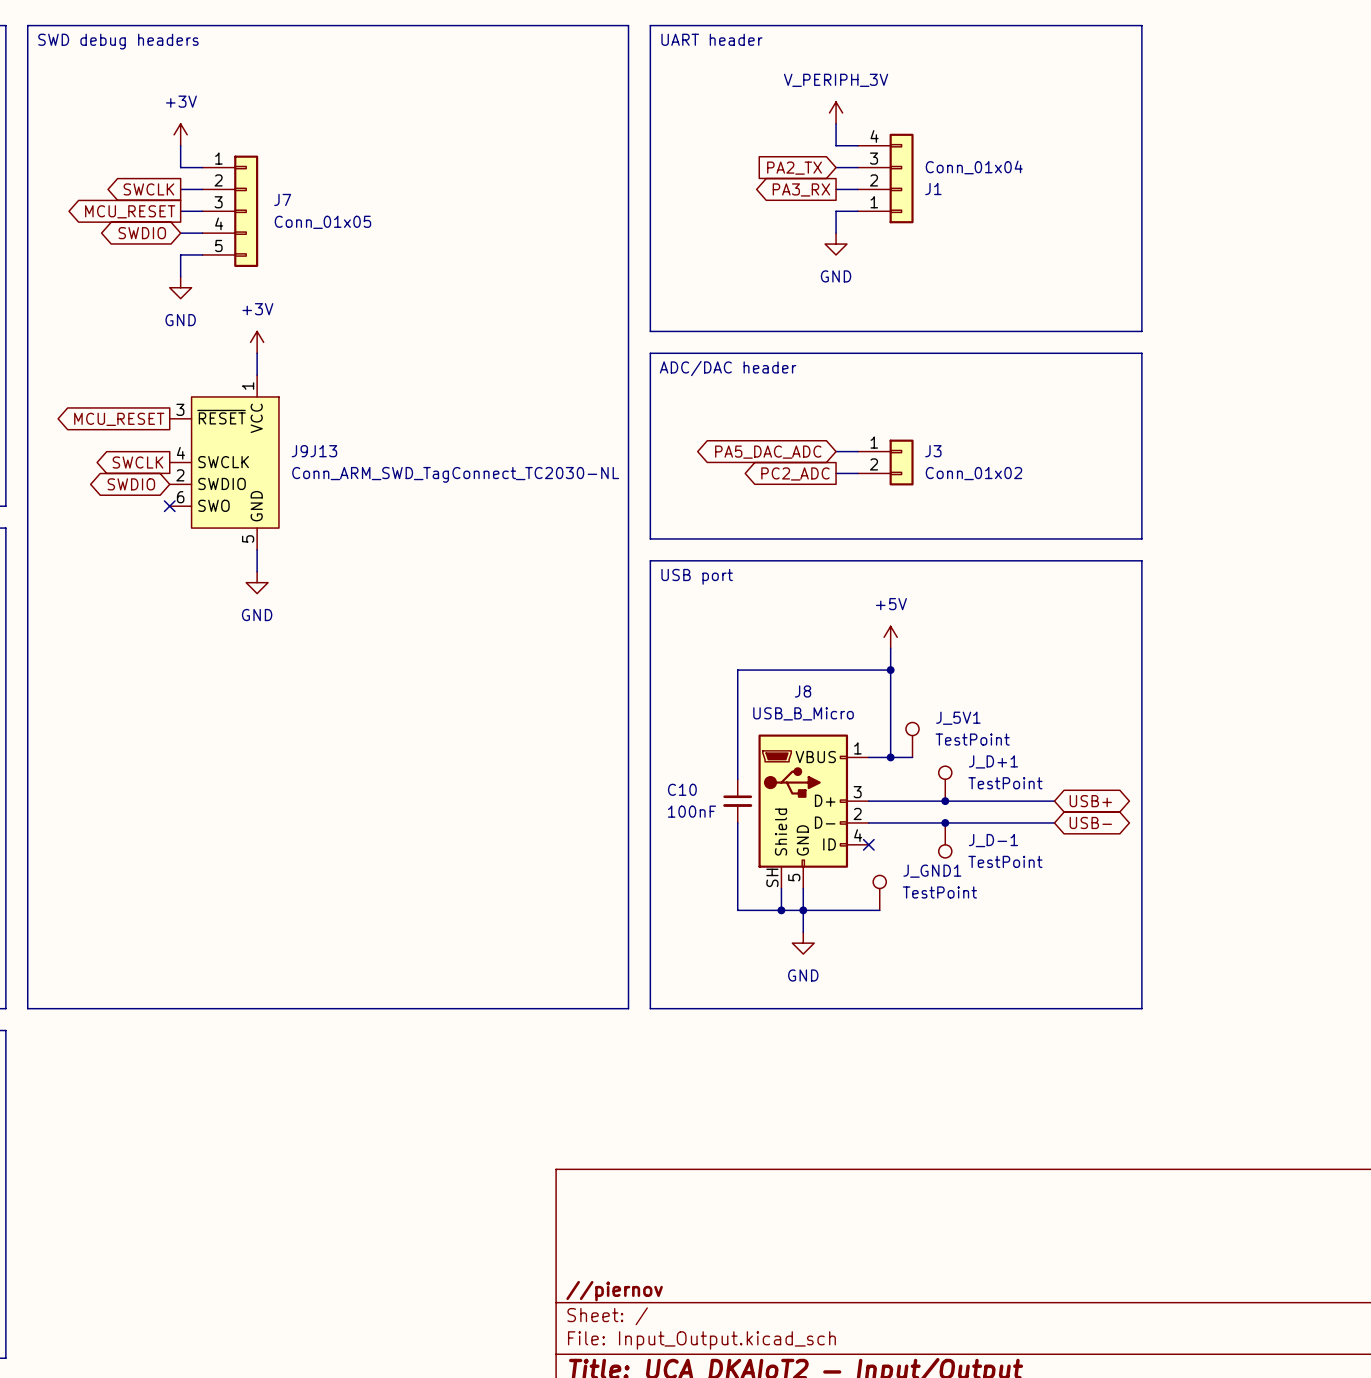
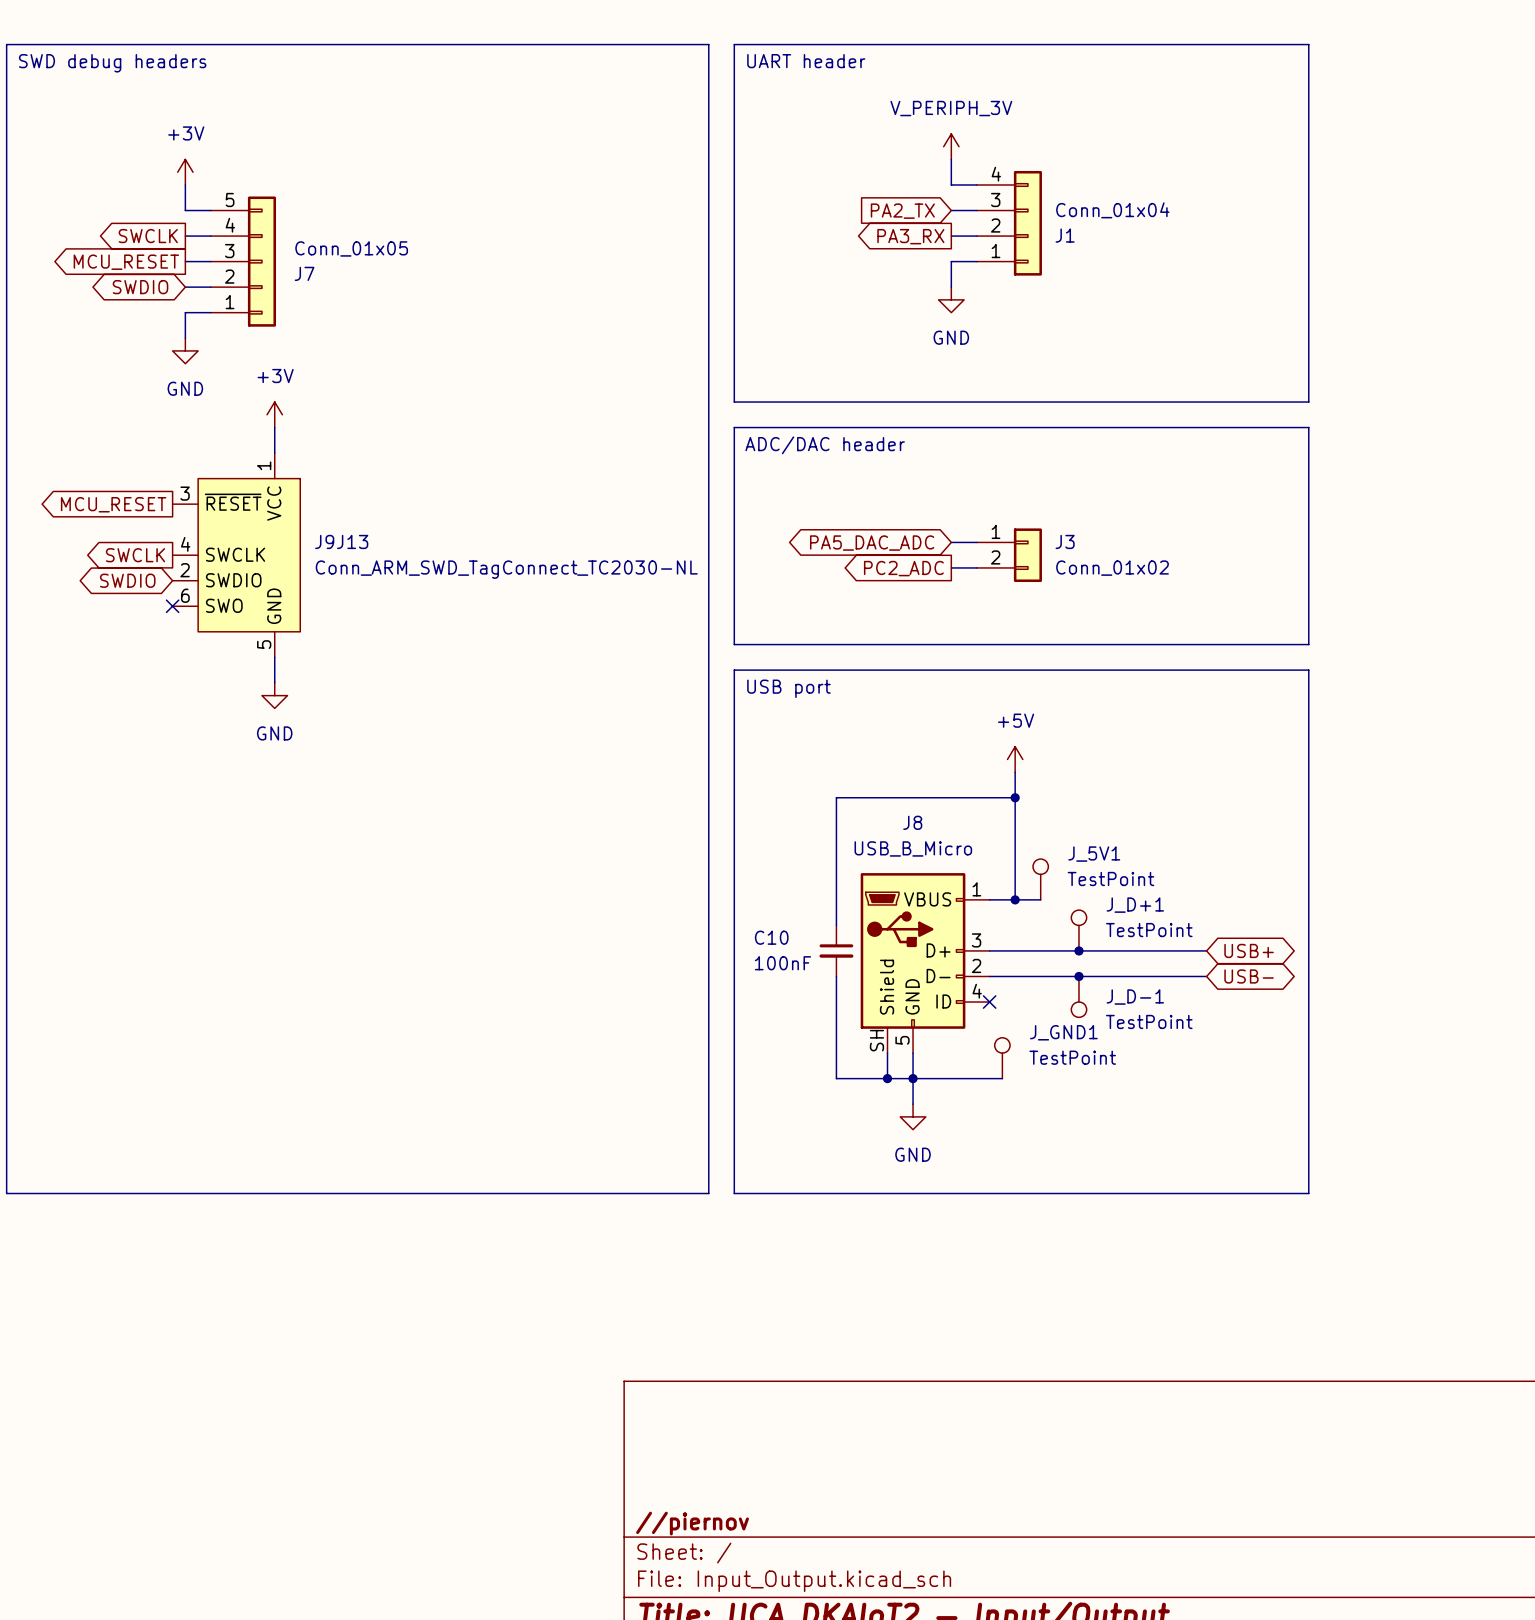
J7 flip: as is (246, 211) -> up-down (261, 261)

